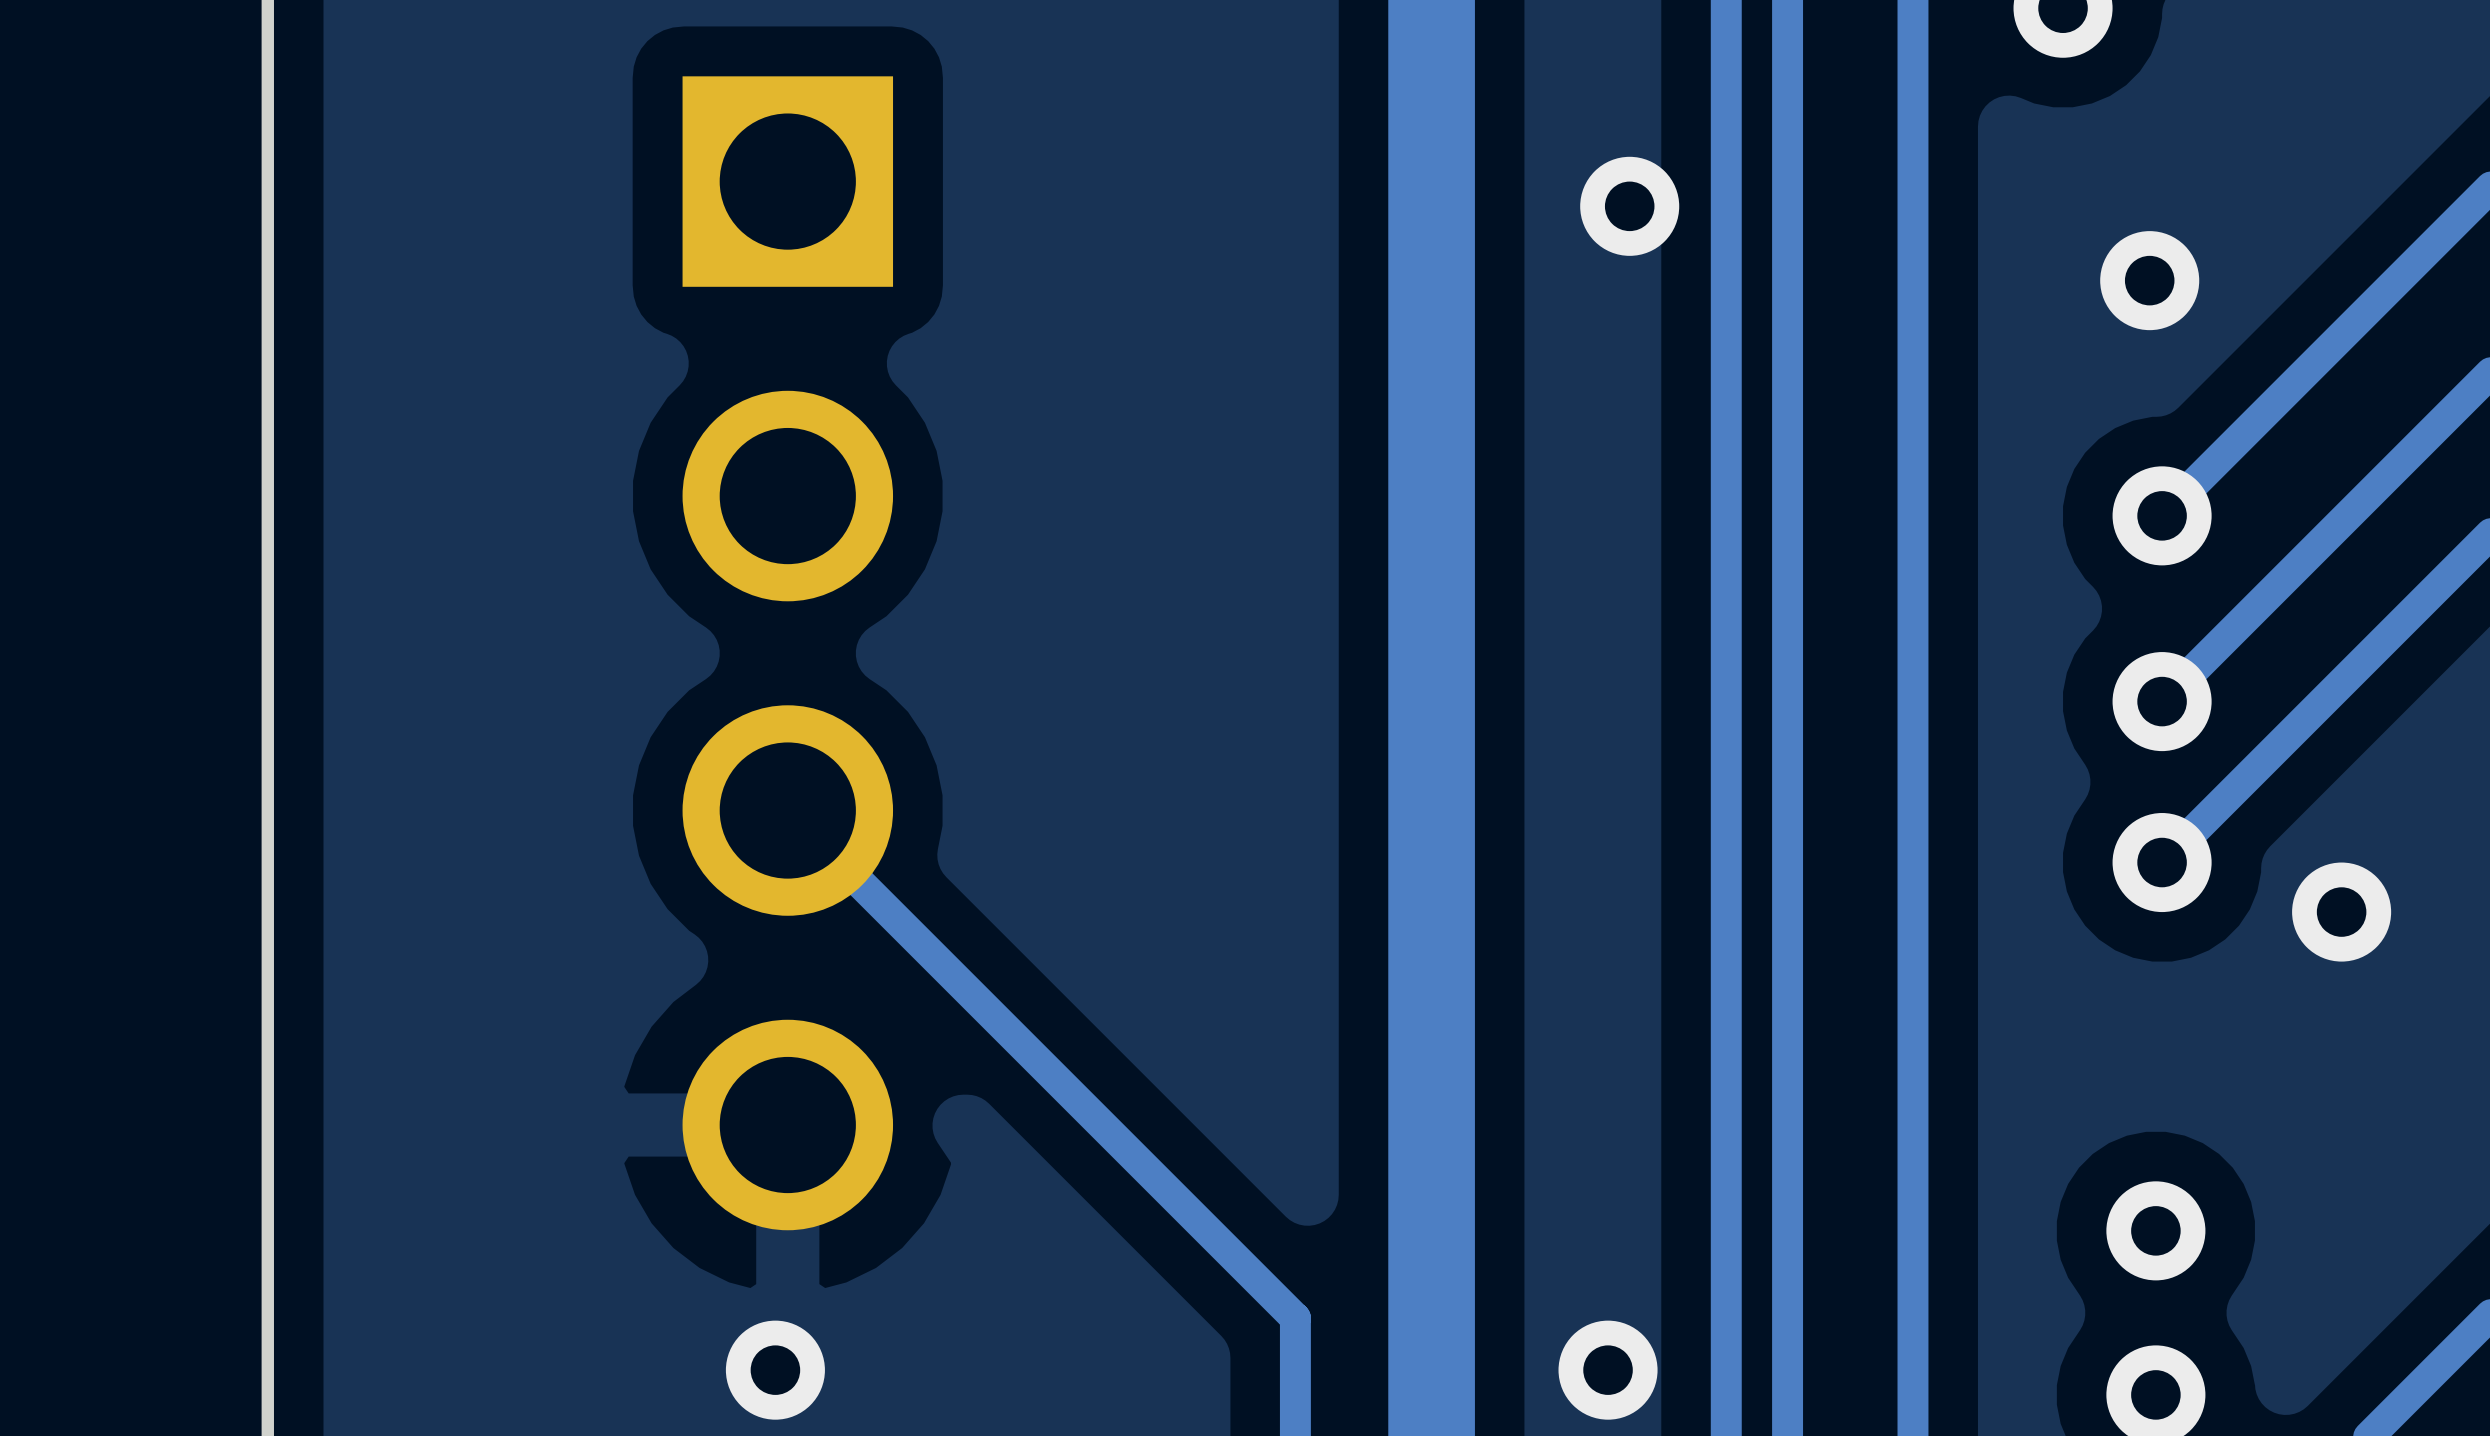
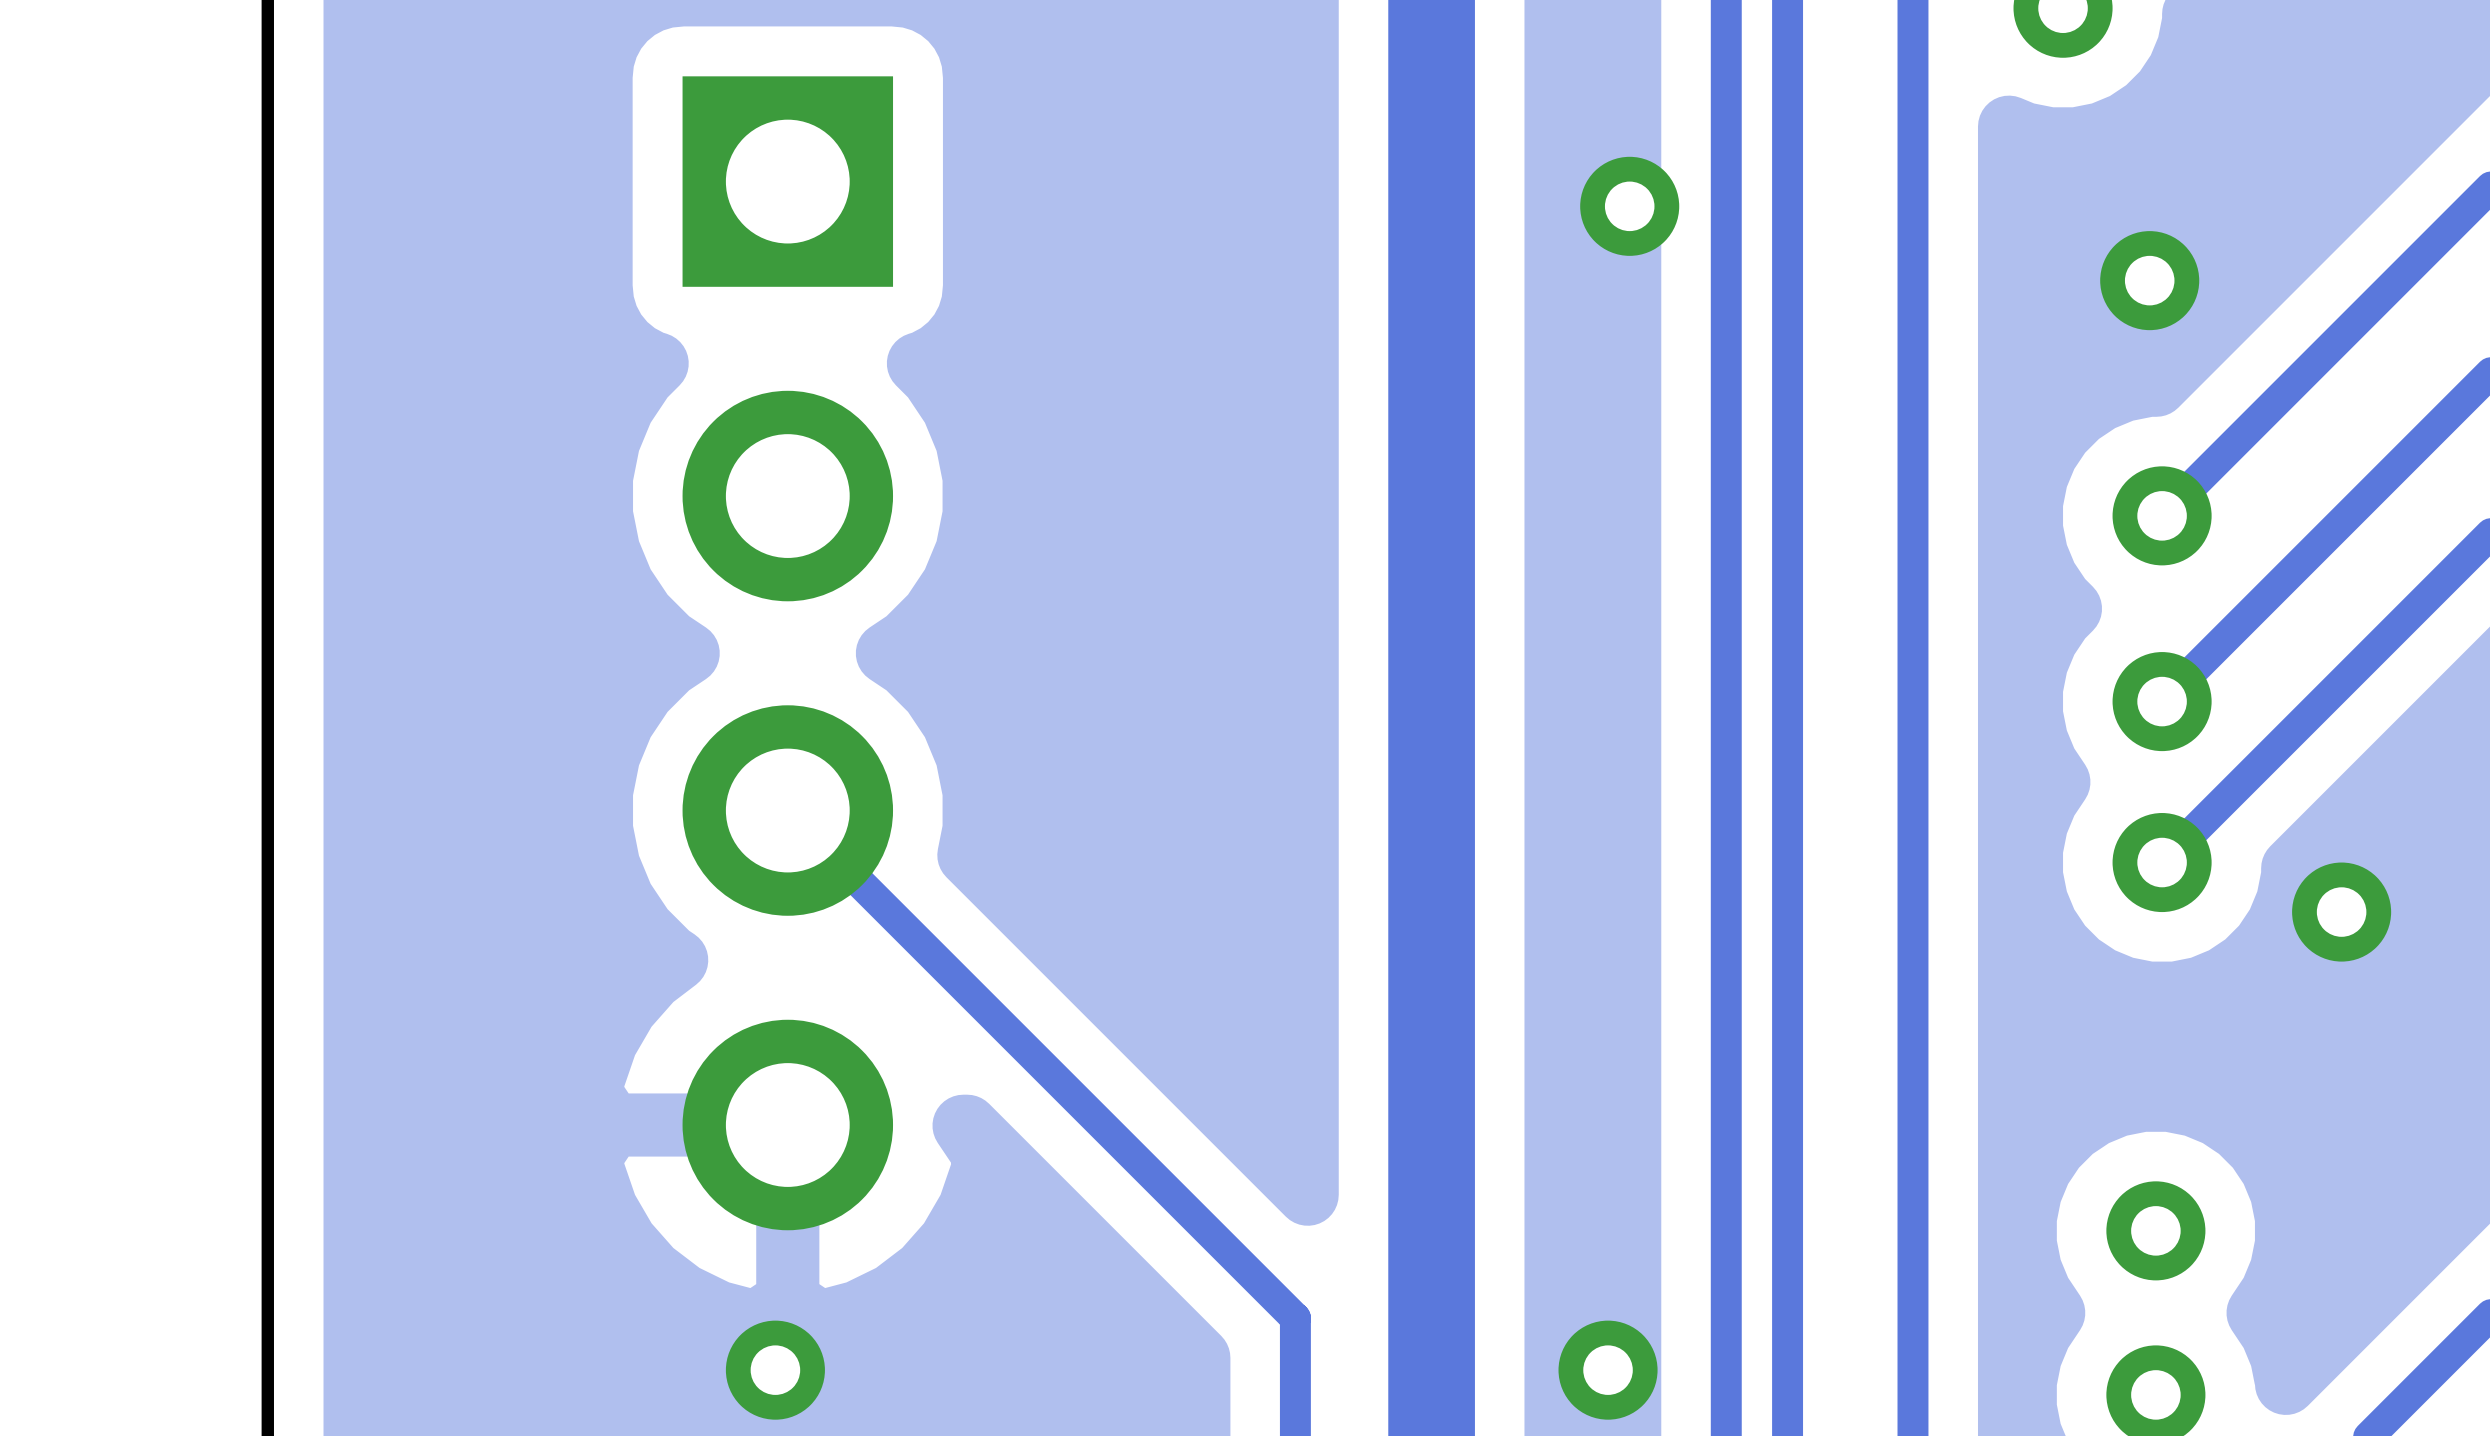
part footprint: [682, 76, 894, 1231] -> [682, 76, 894, 1231]

